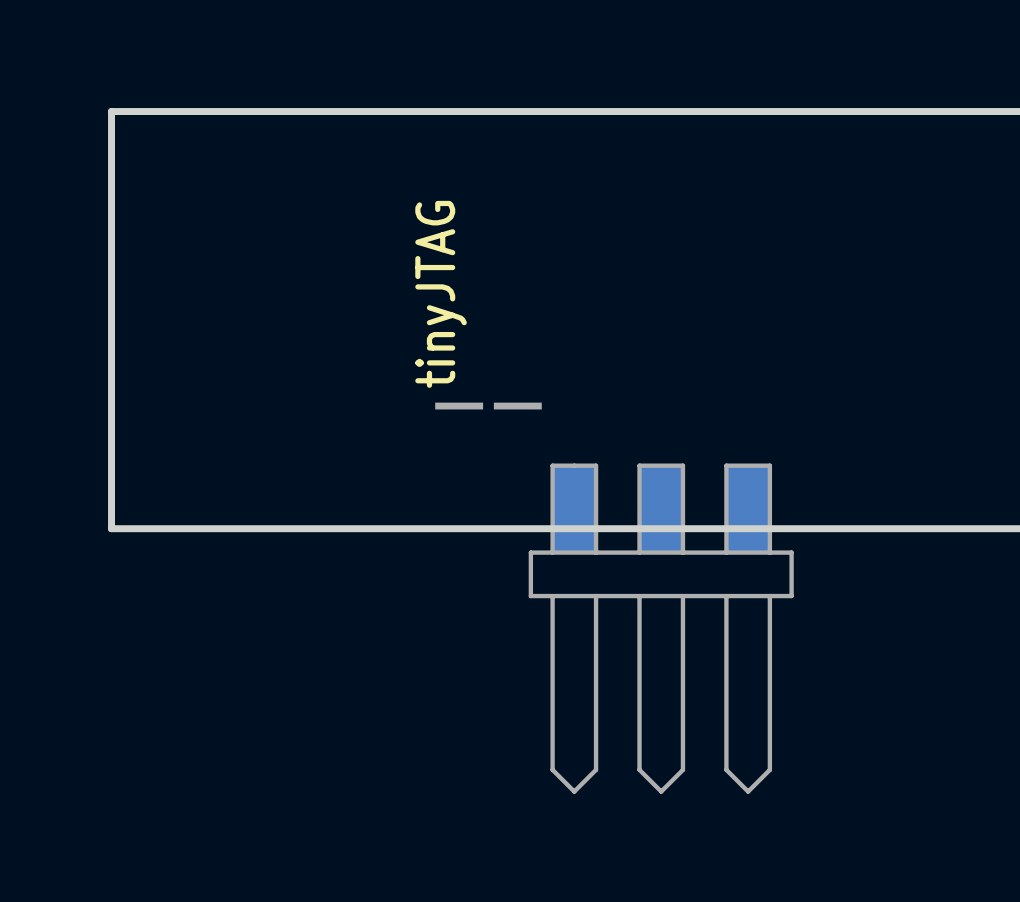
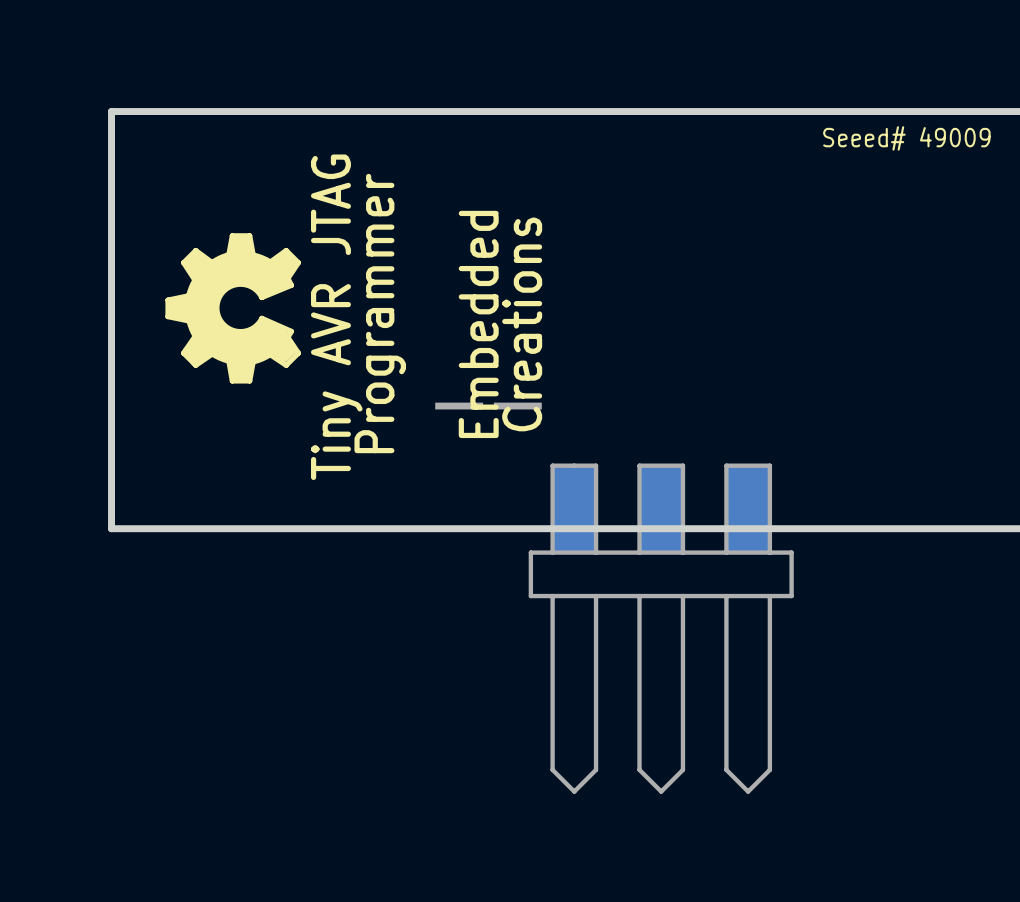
text: none -> Seeed# 49009 (906, 138)
drawing: none -> [165, 233, 301, 384]
text: tinyJTAG (441, 294) -> none
text: none -> Programmer (380, 313)
text: none -> Tiny AVR JTAG (336, 317)
text: none -> Embedded (478, 324)
text: none -> Creations (522, 324)

